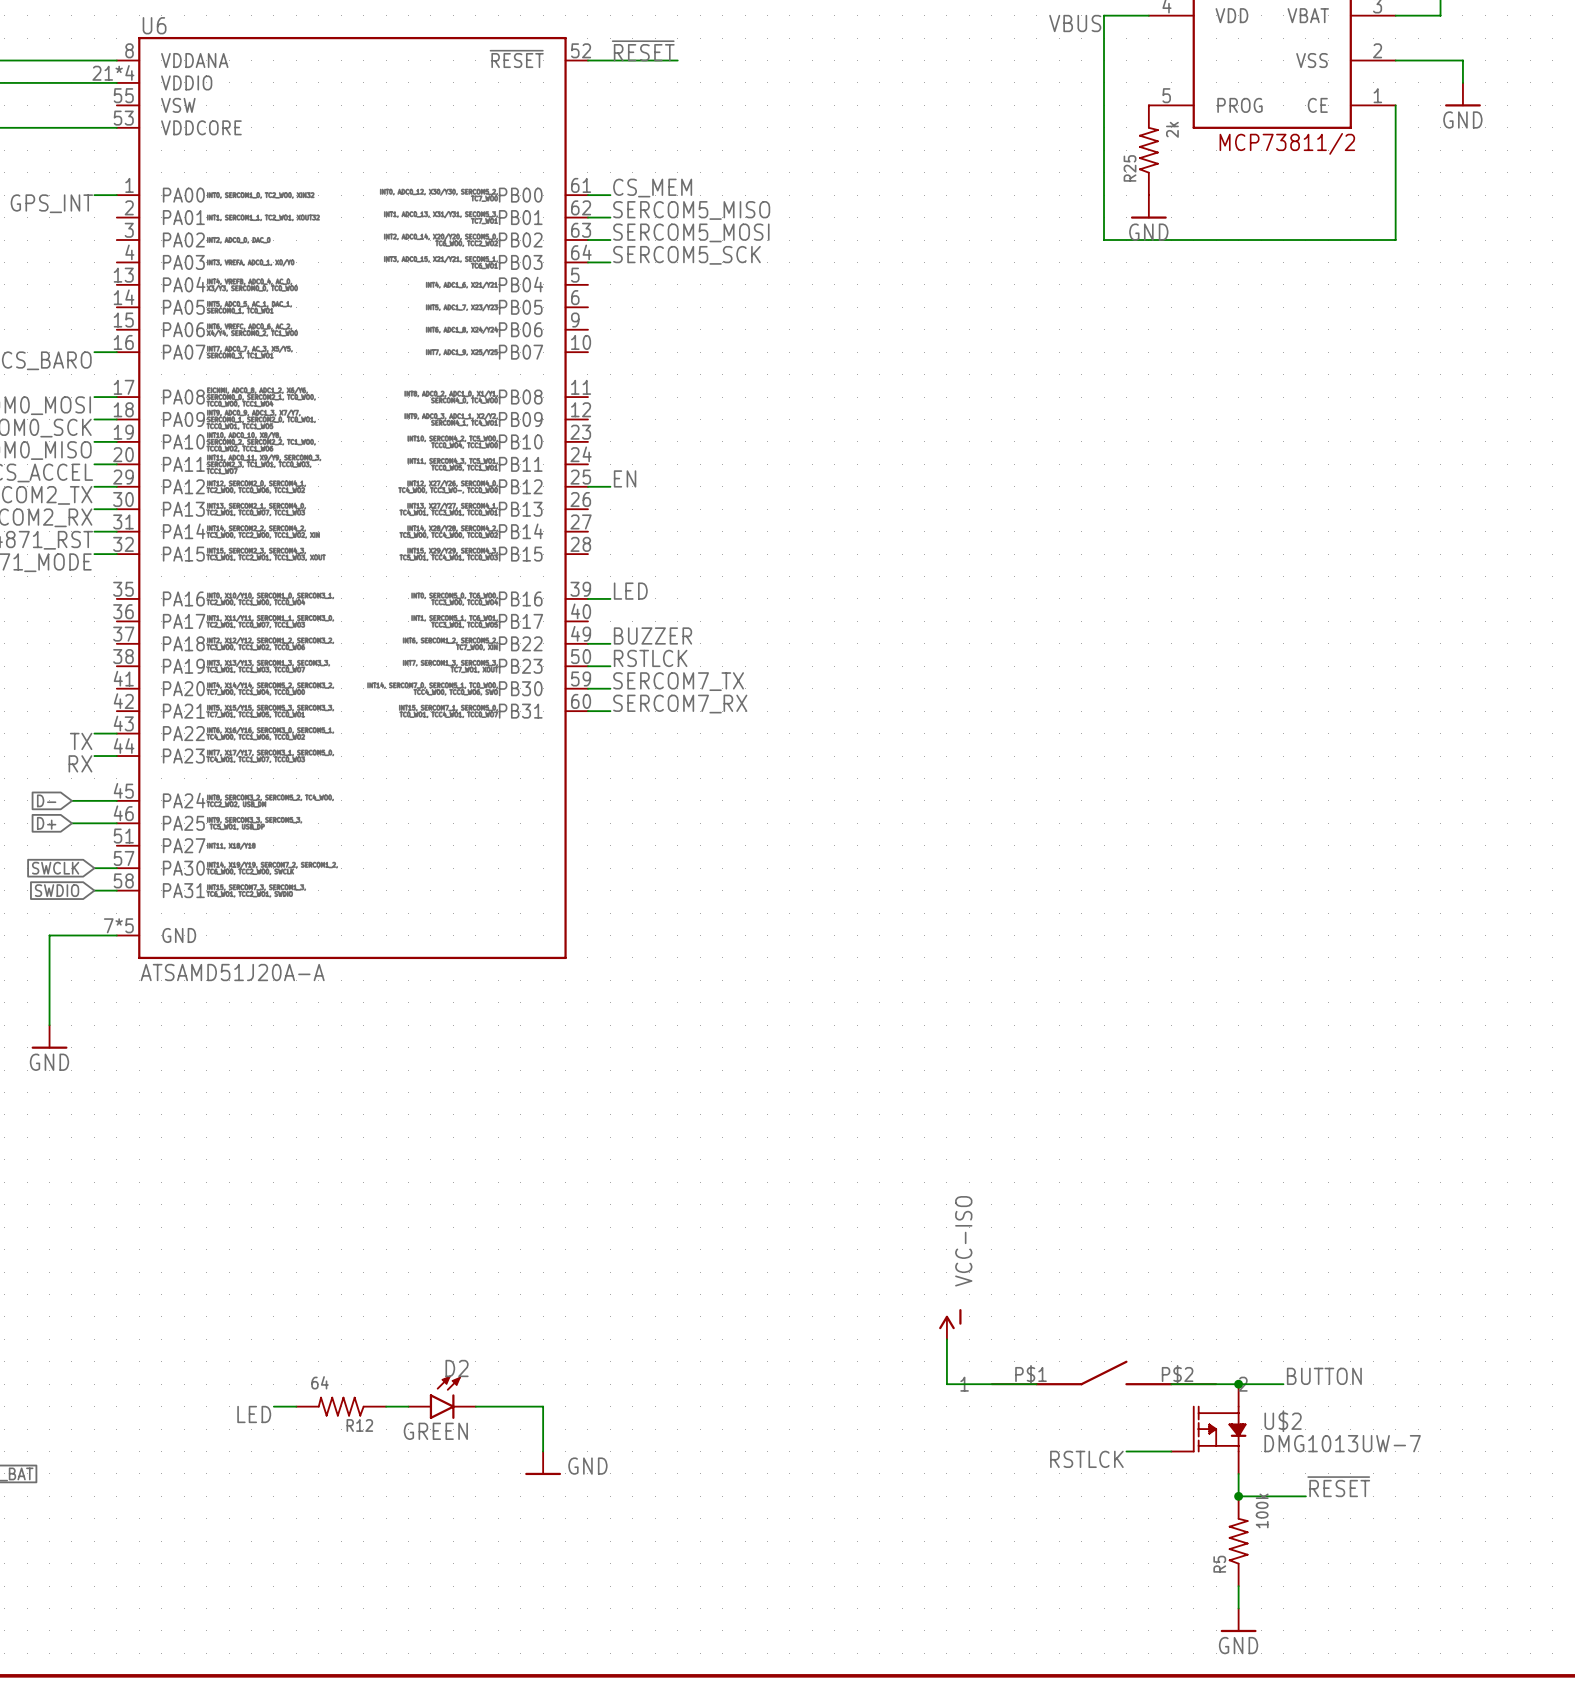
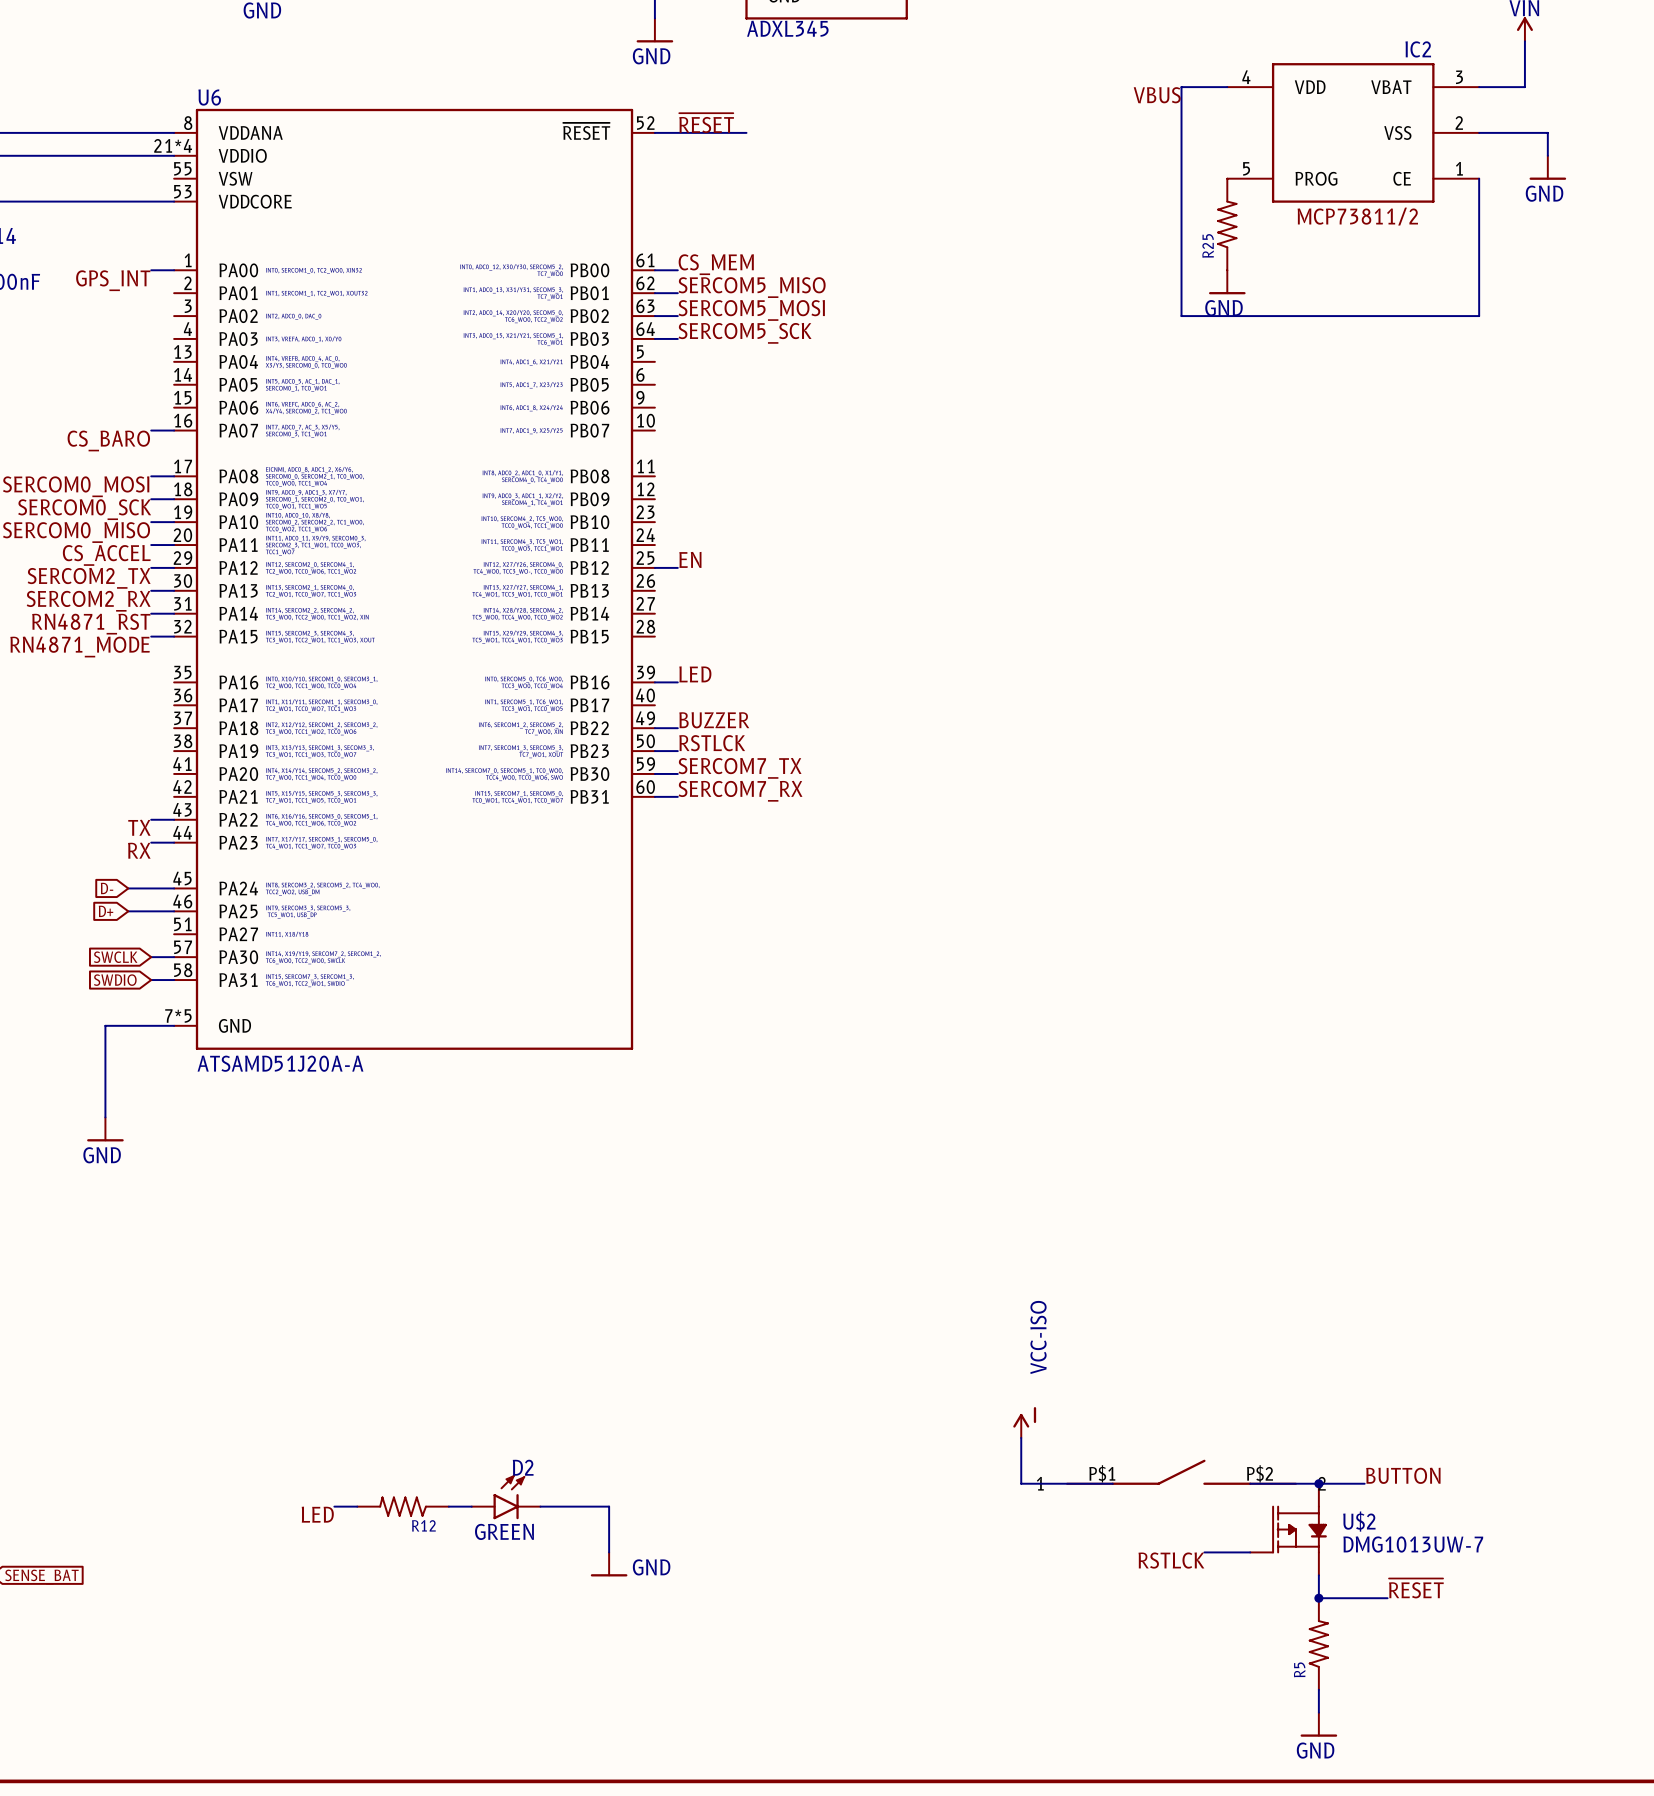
R25 value: 2k (1172, 129) -> none
R12 value: 64 (320, 1382) -> none
R5 value: 100k (1262, 1510) -> none

